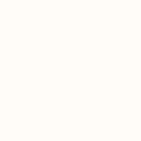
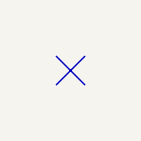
no-connect mark: none -> (70, 70)

